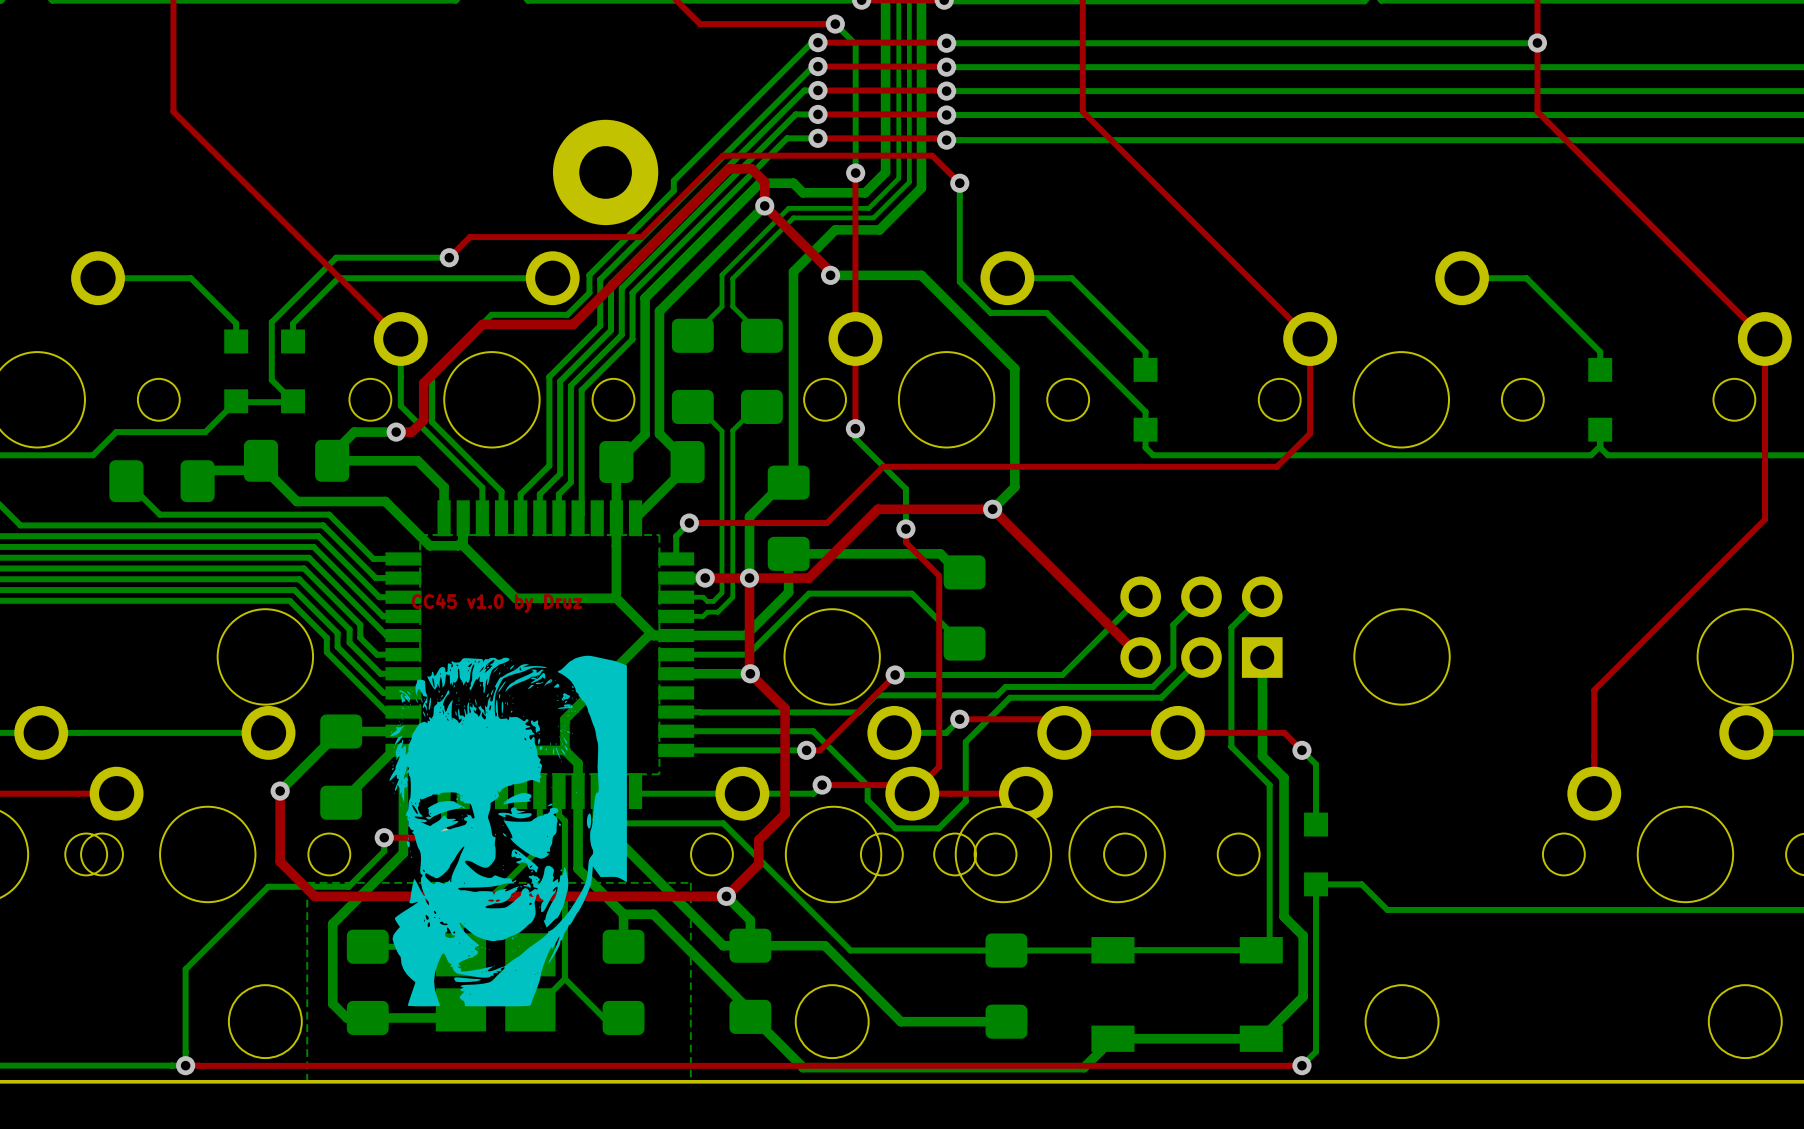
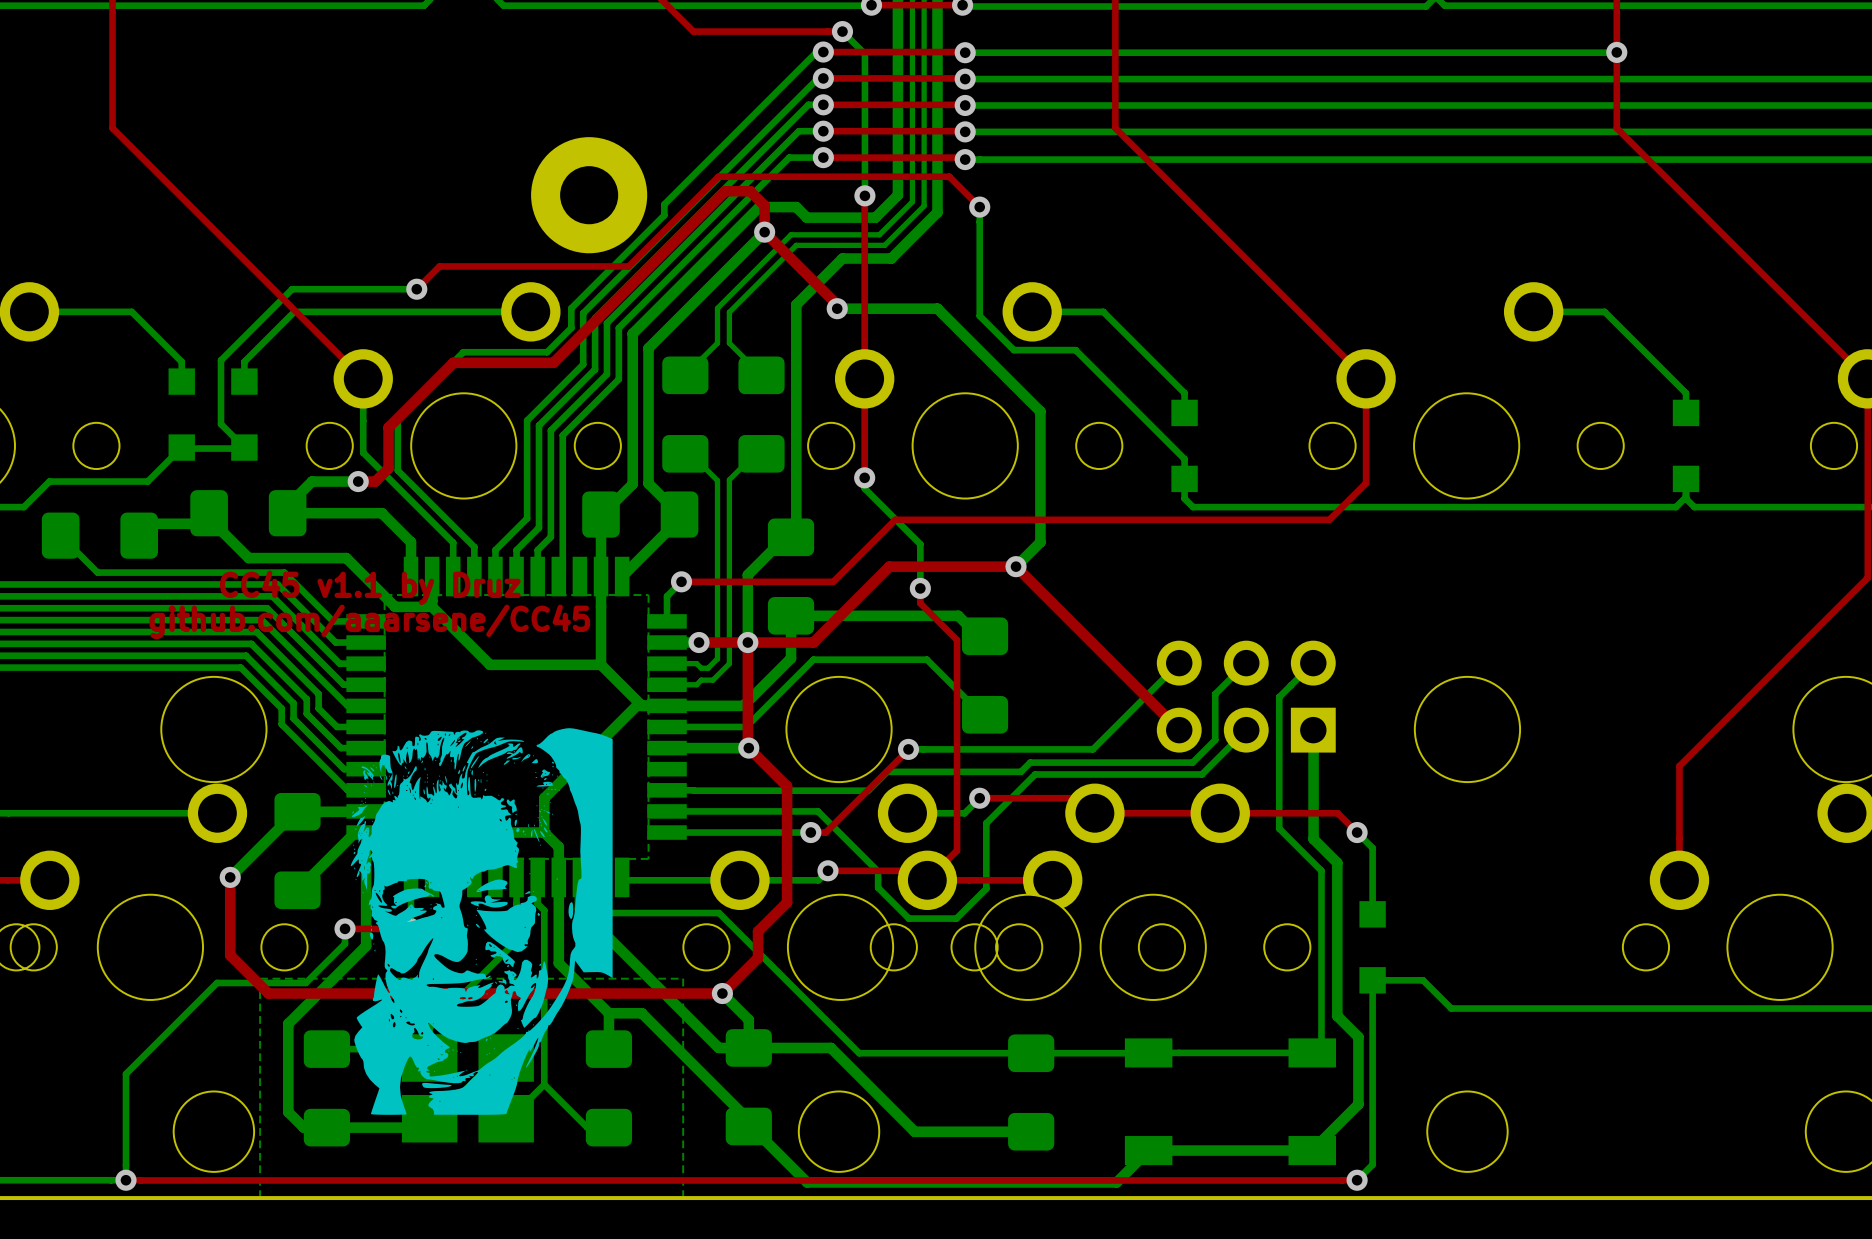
text: none -> CC45 v1.1 by Druz (370, 587)
text: none -> github.com/aaarsene/CC45 (369, 621)
text: CC45 v1.0 by Druz (497, 603) -> none

